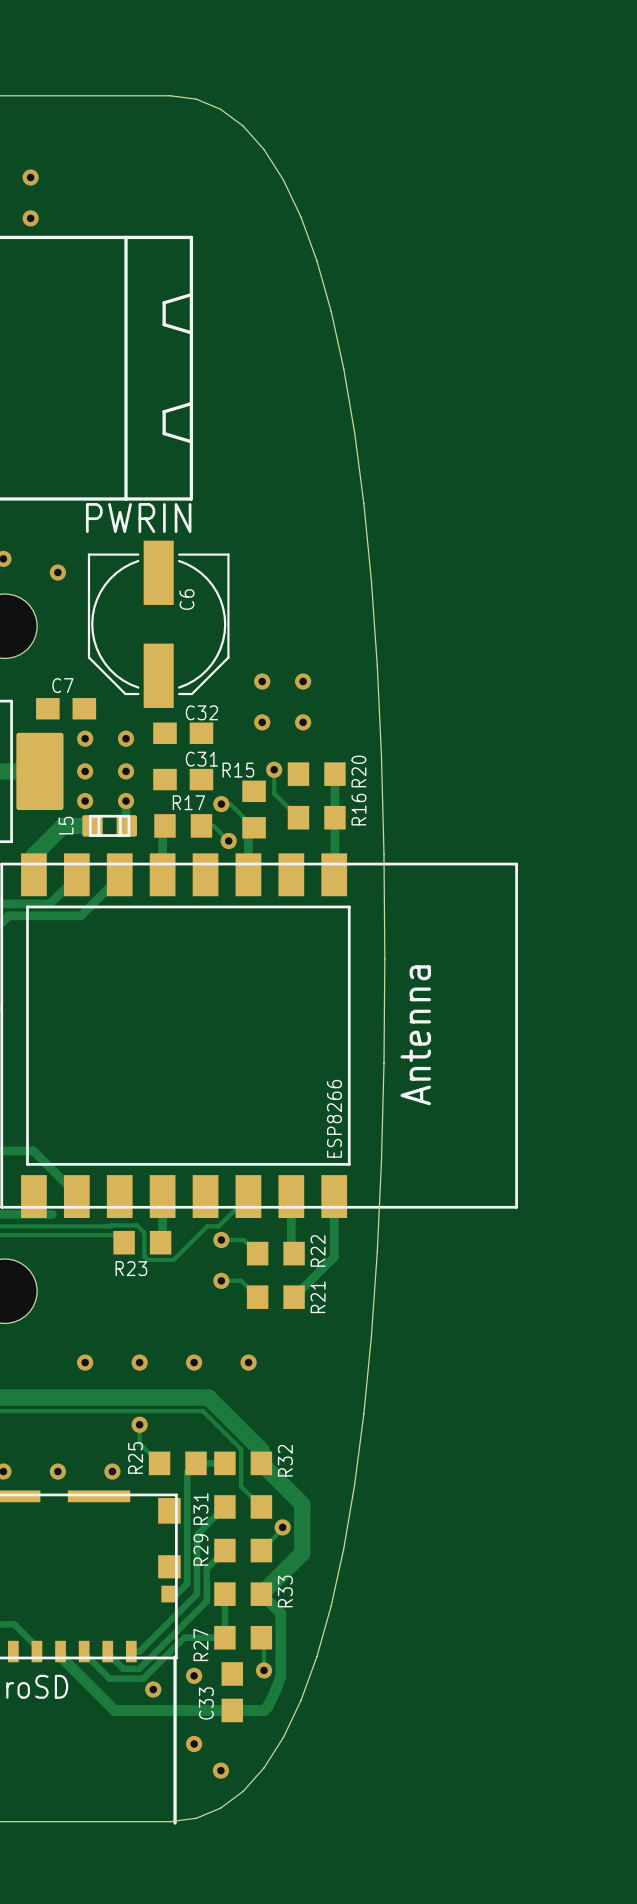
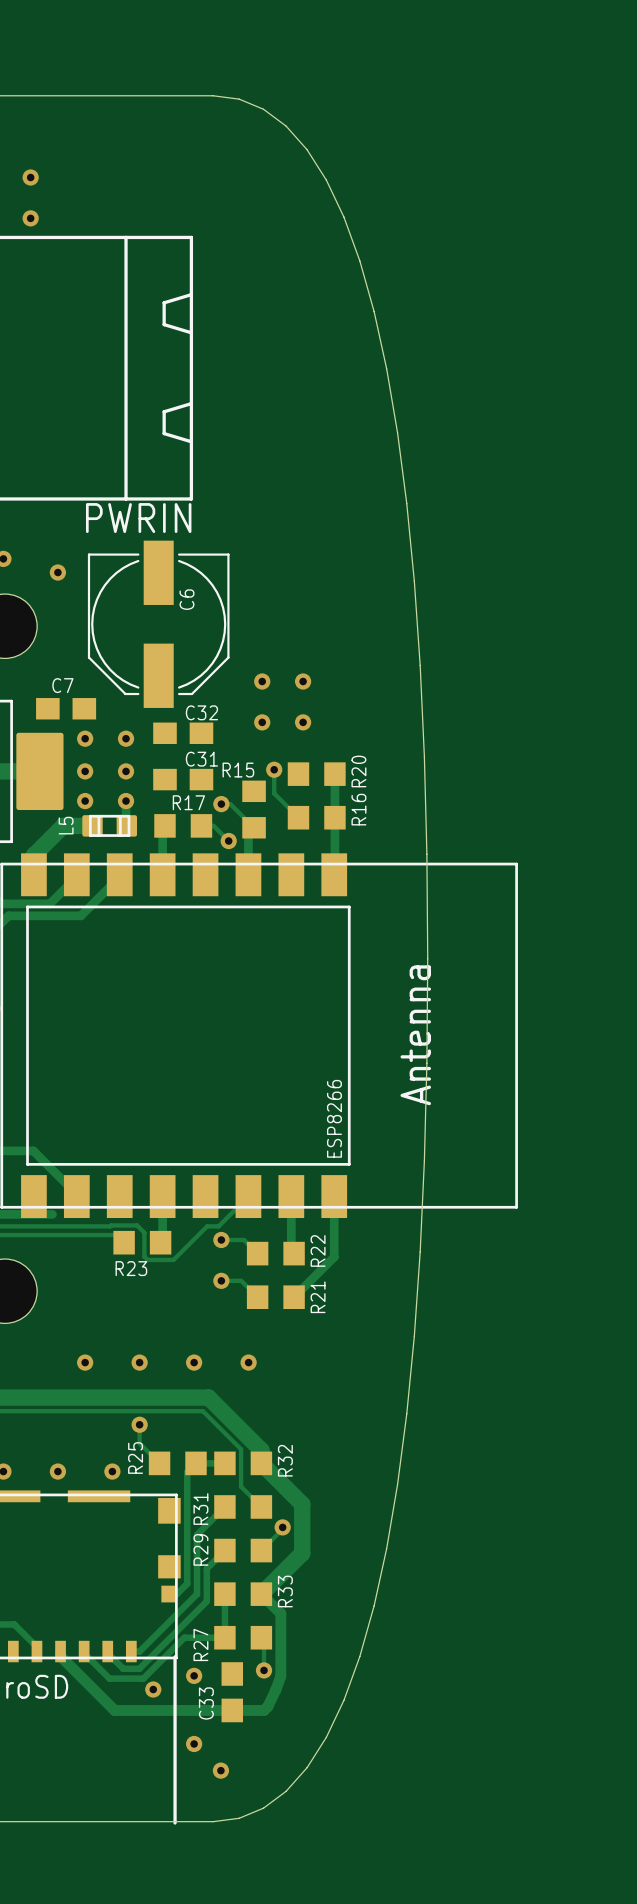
board edge: (170, 95) (196, 99) (220, 109) (243, 126) (264, 149) (283, 180) (301, 217) (316, 260) (331, 311) (354, 432) (371, 581) (381, 756) (384, 958) (381, 1160) (371, 1336) (354, 1484) (331, 1605) (316, 1656) (301, 1700) (283, 1737) (264, 1767) (243, 1791) (220, 1808) (196, 1818) (170, 1821) -> (170, 95) (213, 95) (239, 99) (263, 109) (286, 126) (307, 149) (326, 180) (343, 217) (359, 260) (374, 311) (386, 368) (406, 503) (414, 581) (424, 756) (427, 958) (424, 1160) (414, 1336) (406, 1413) (386, 1548) (374, 1605) (359, 1656) (343, 1700) (326, 1737) (307, 1767) (286, 1791) (263, 1808) (239, 1818) (213, 1821) (170, 1821)

